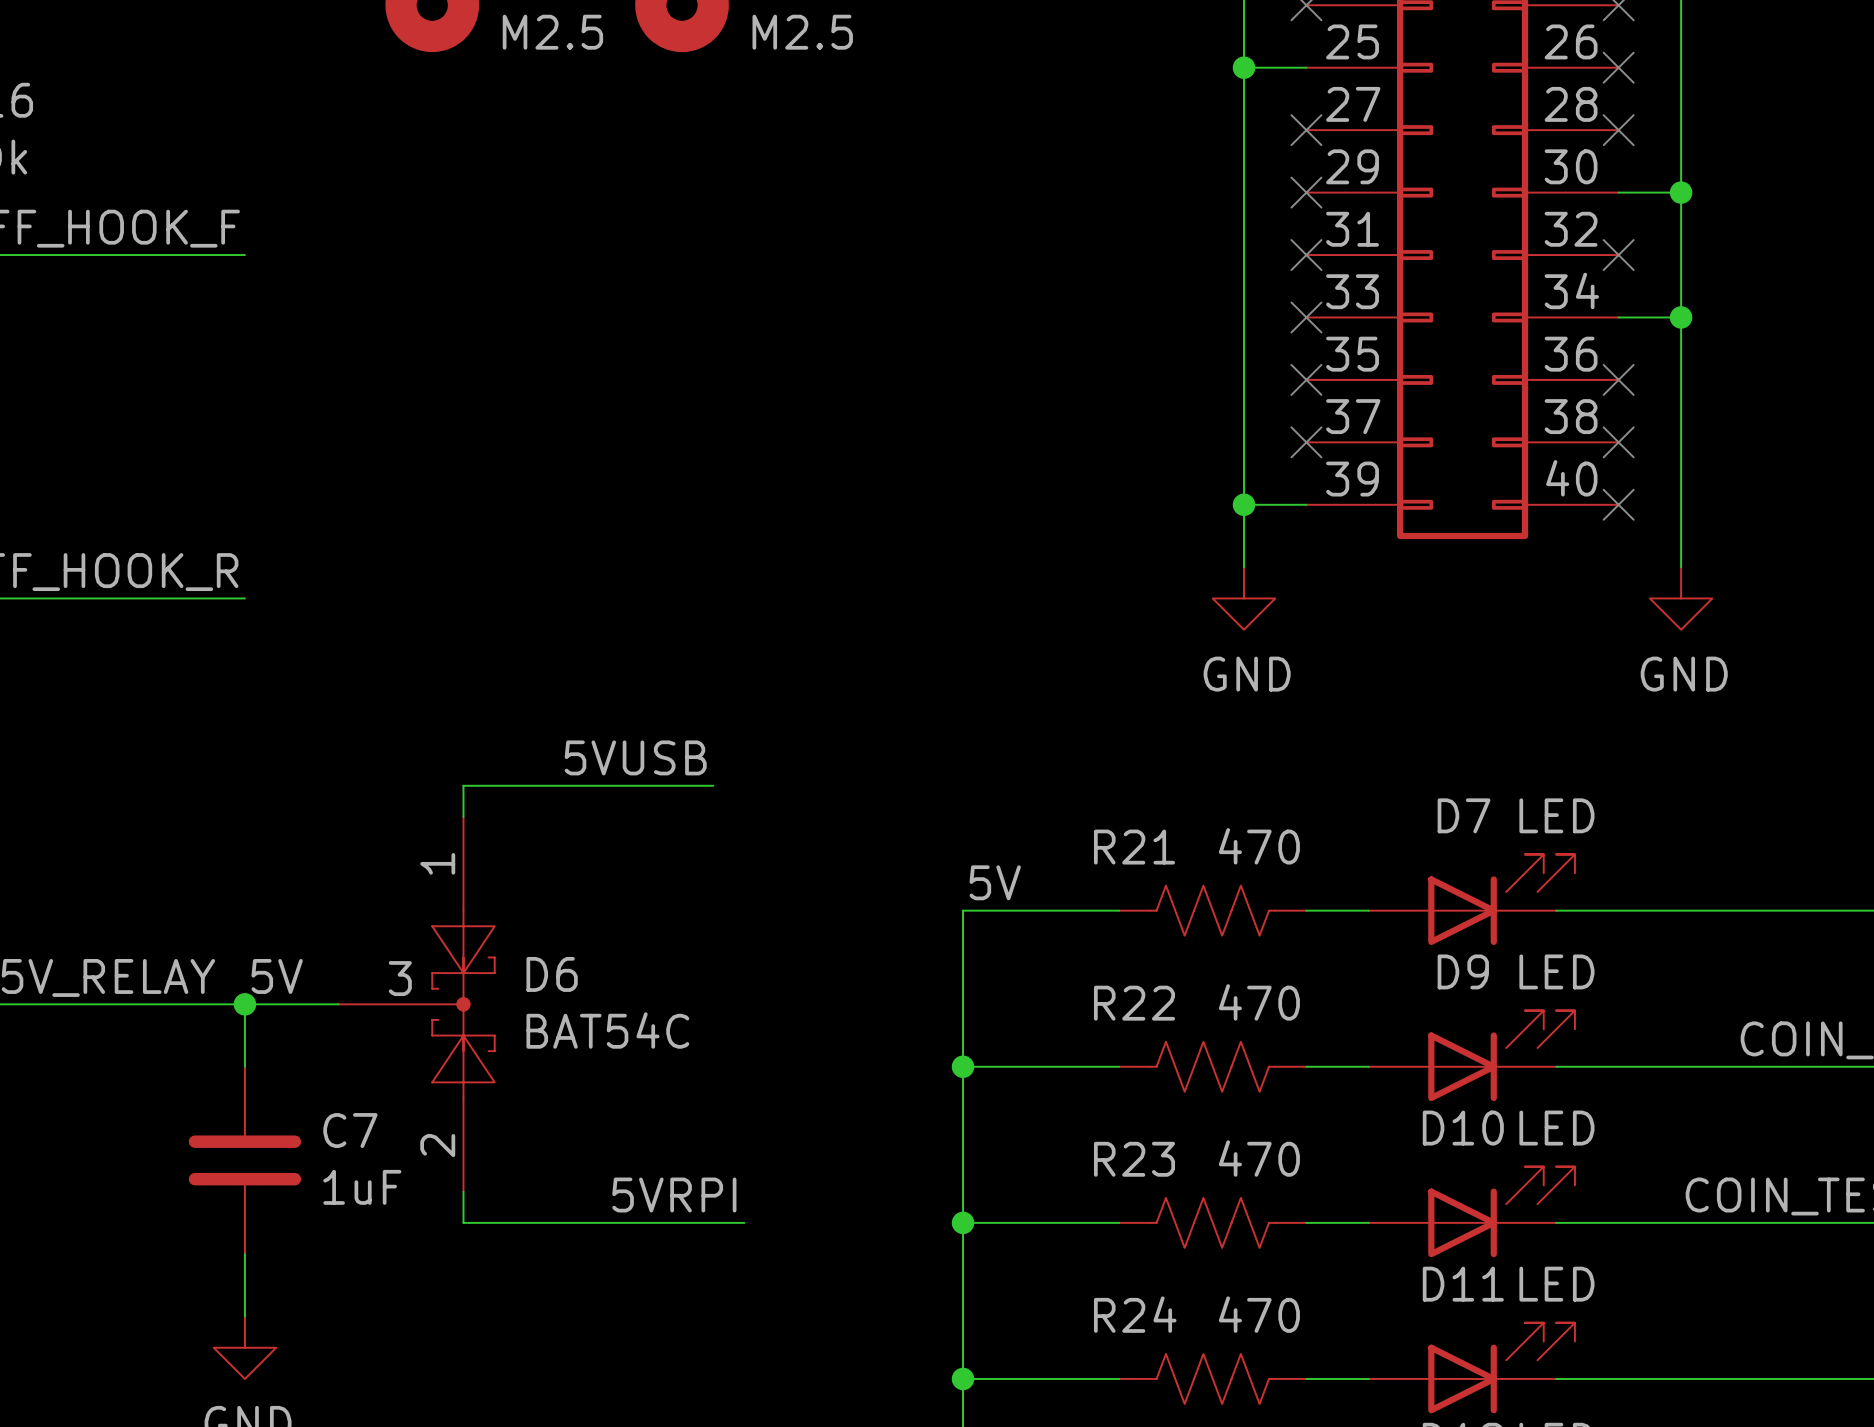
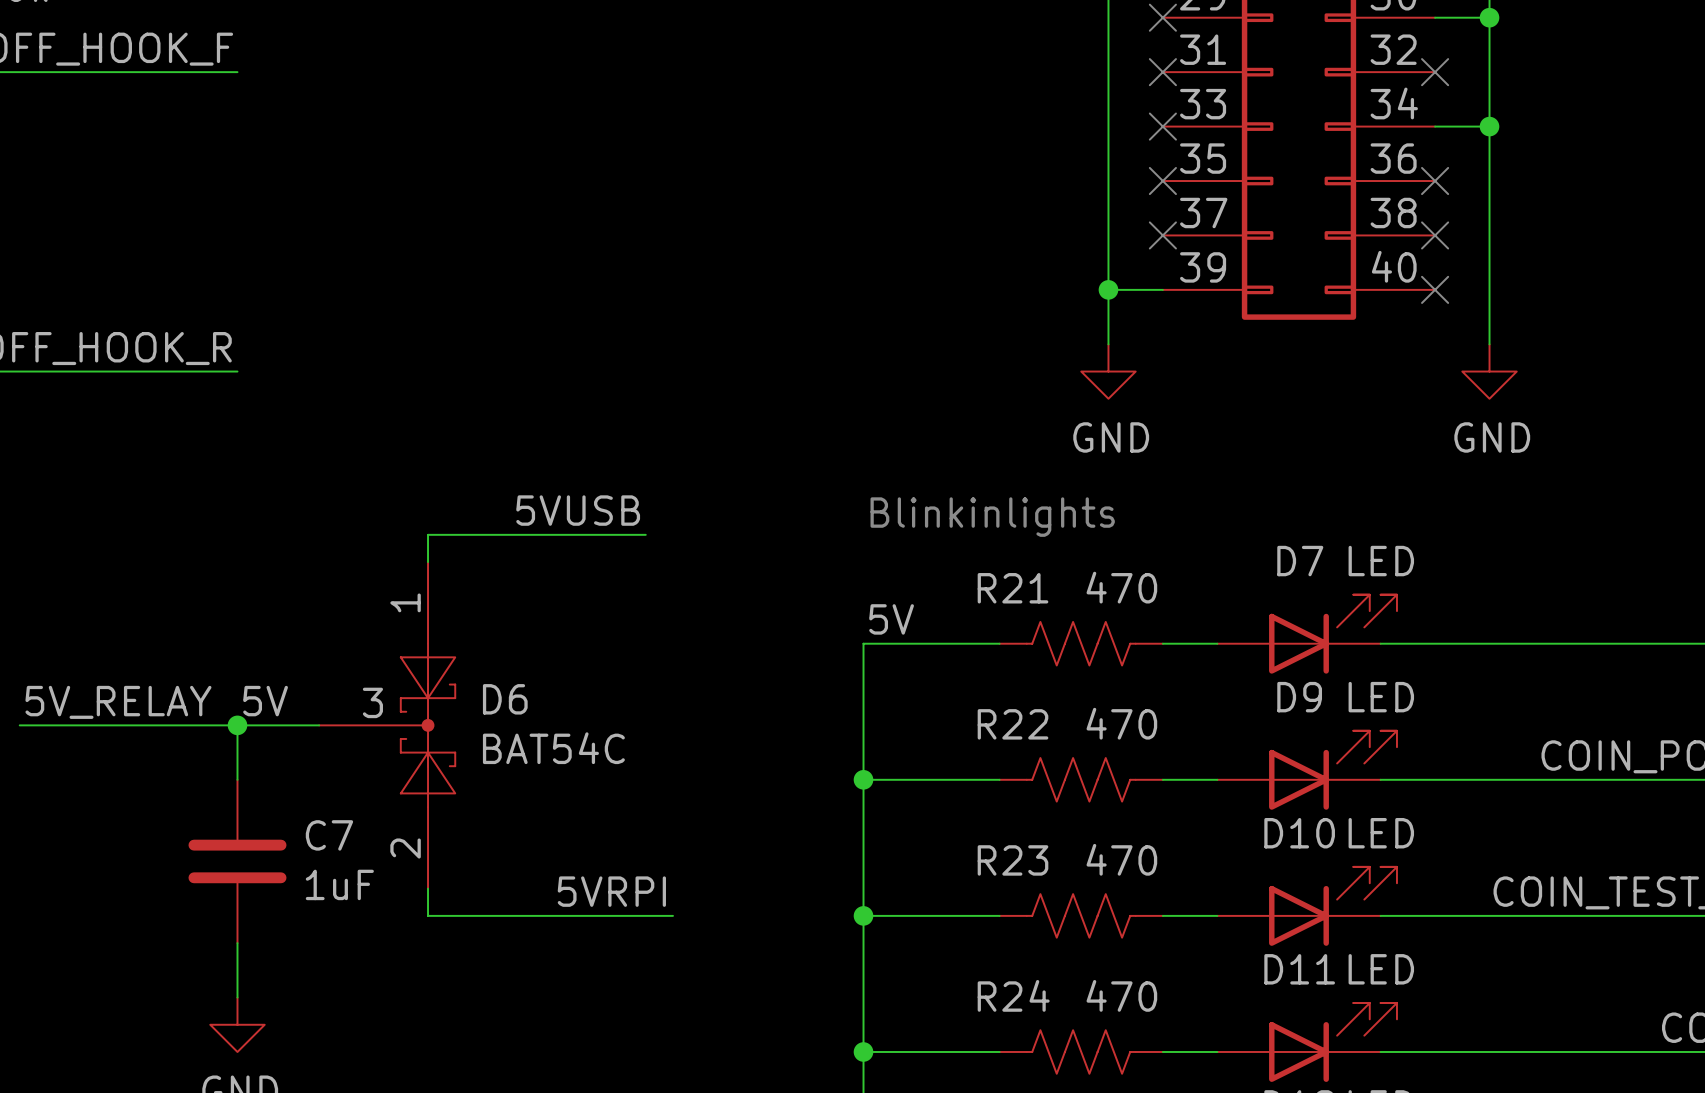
text: none -> Blinkinlights (992, 517)

